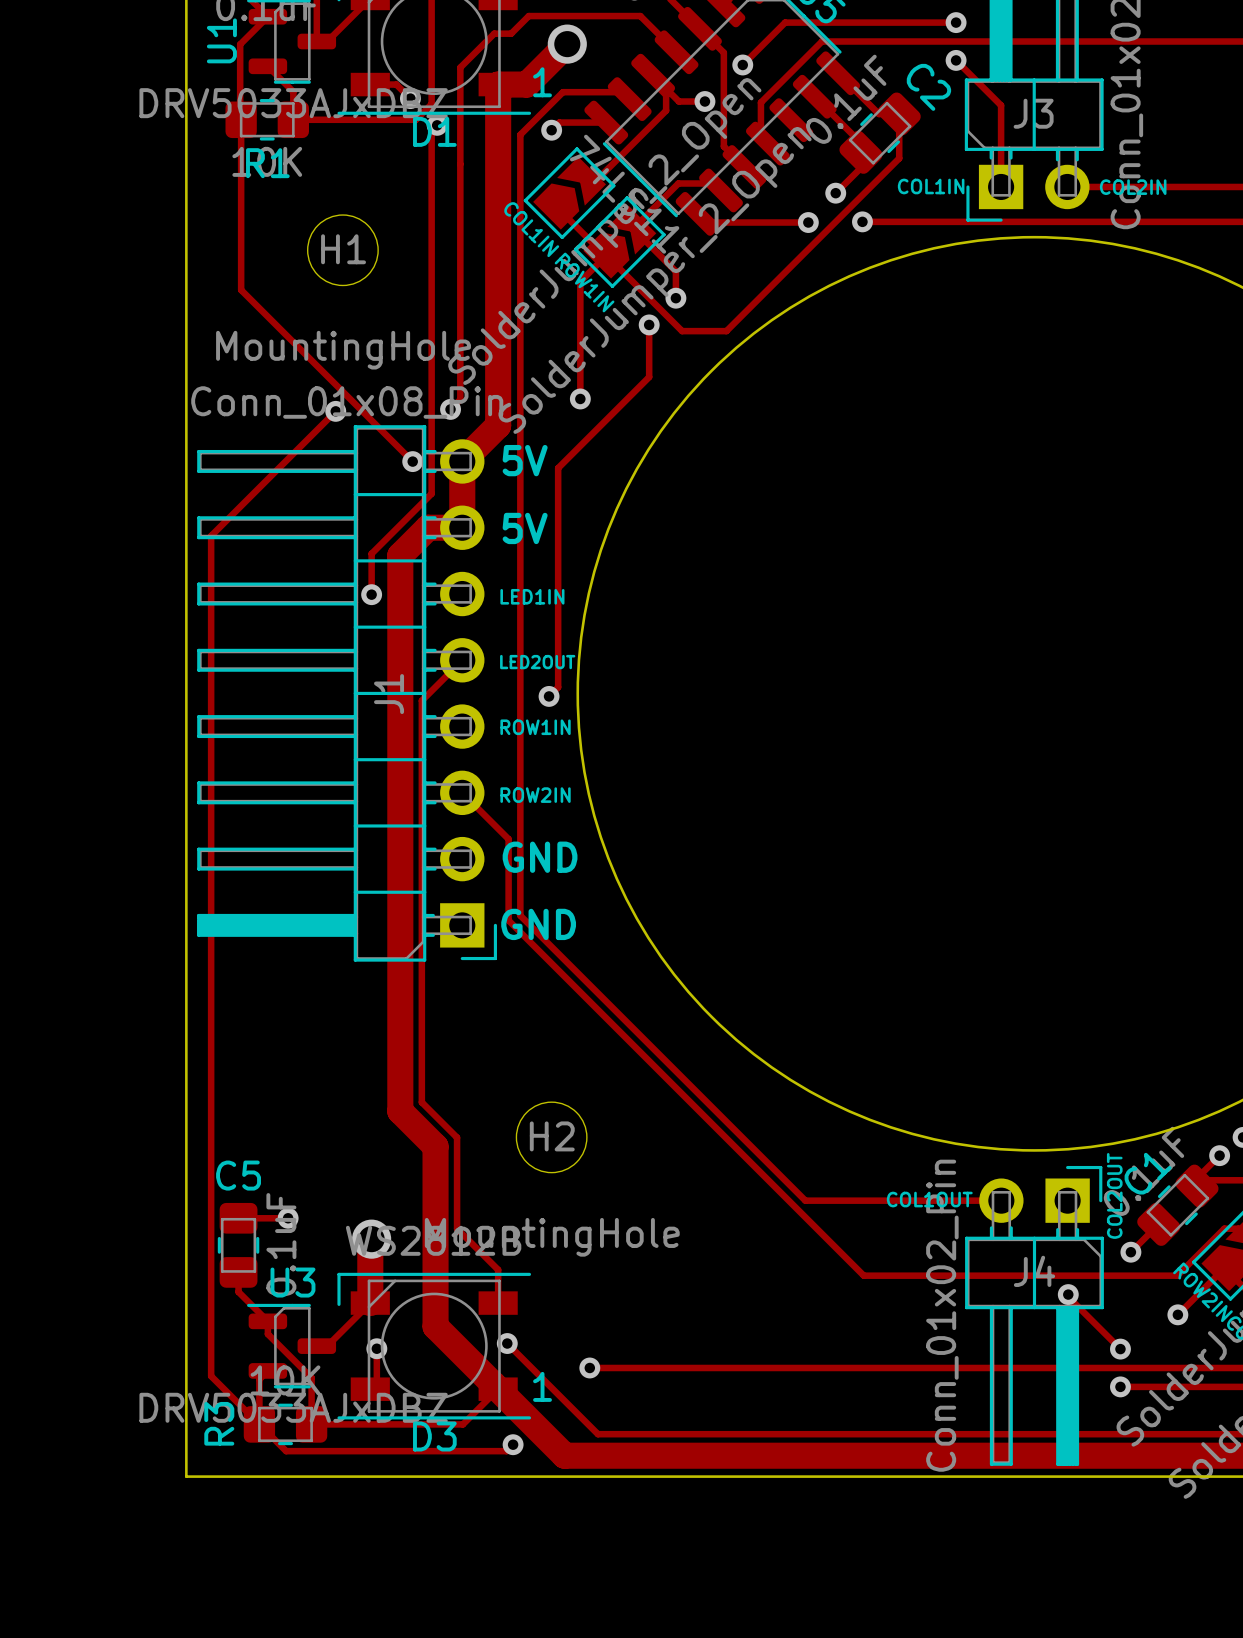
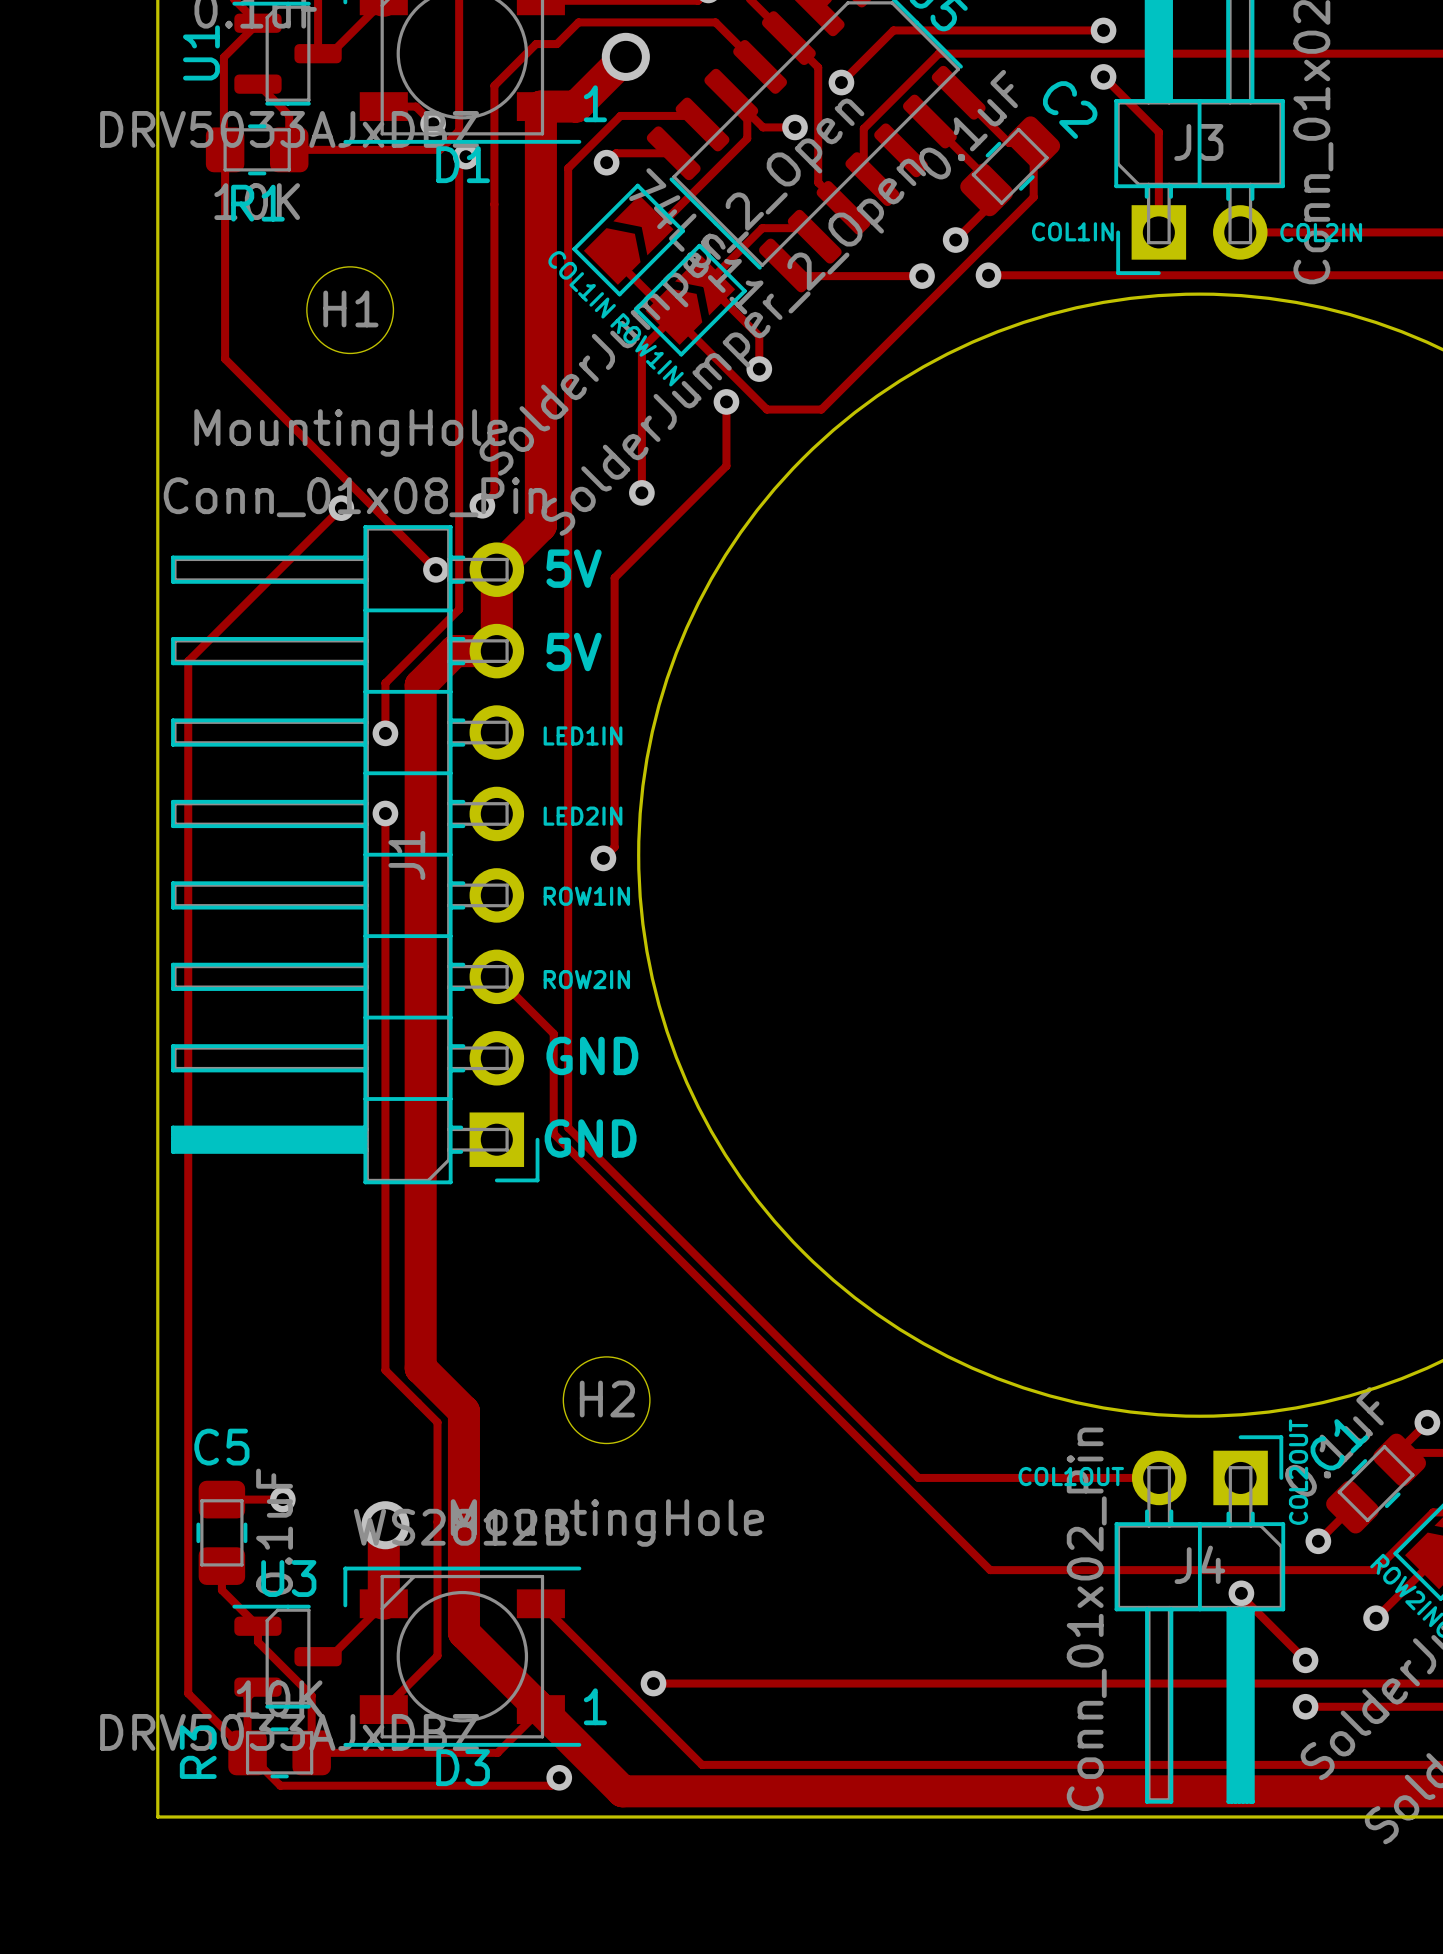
via: none -> (385, 813)
track: (462, 660) (421, 700) (421, 1102) (457, 1137) (457, 1228) (498, 1269) (498, 1303) -> none
text: LED2OUT (537, 662) -> LED2IN (583, 816)
track: (507, 1343) (597, 1434) (629, 1434) -> (540, 1603) (702, 1764)
via: (507, 1343) -> none
track: (376, 1348) (376, 1382) -> (385, 813) (385, 1370) (437, 1422) (437, 1655) (391, 1701)
via: (376, 1348) -> none

